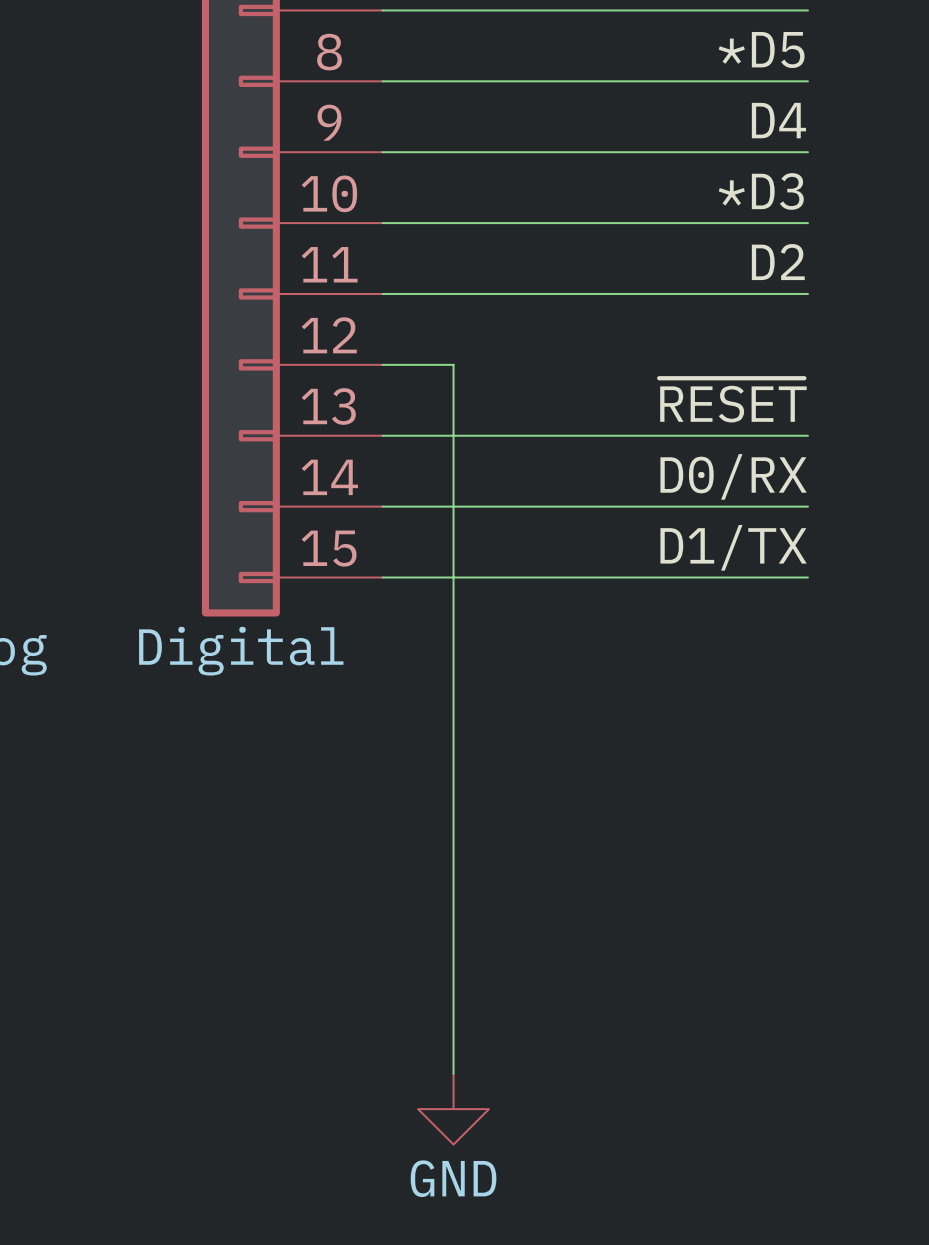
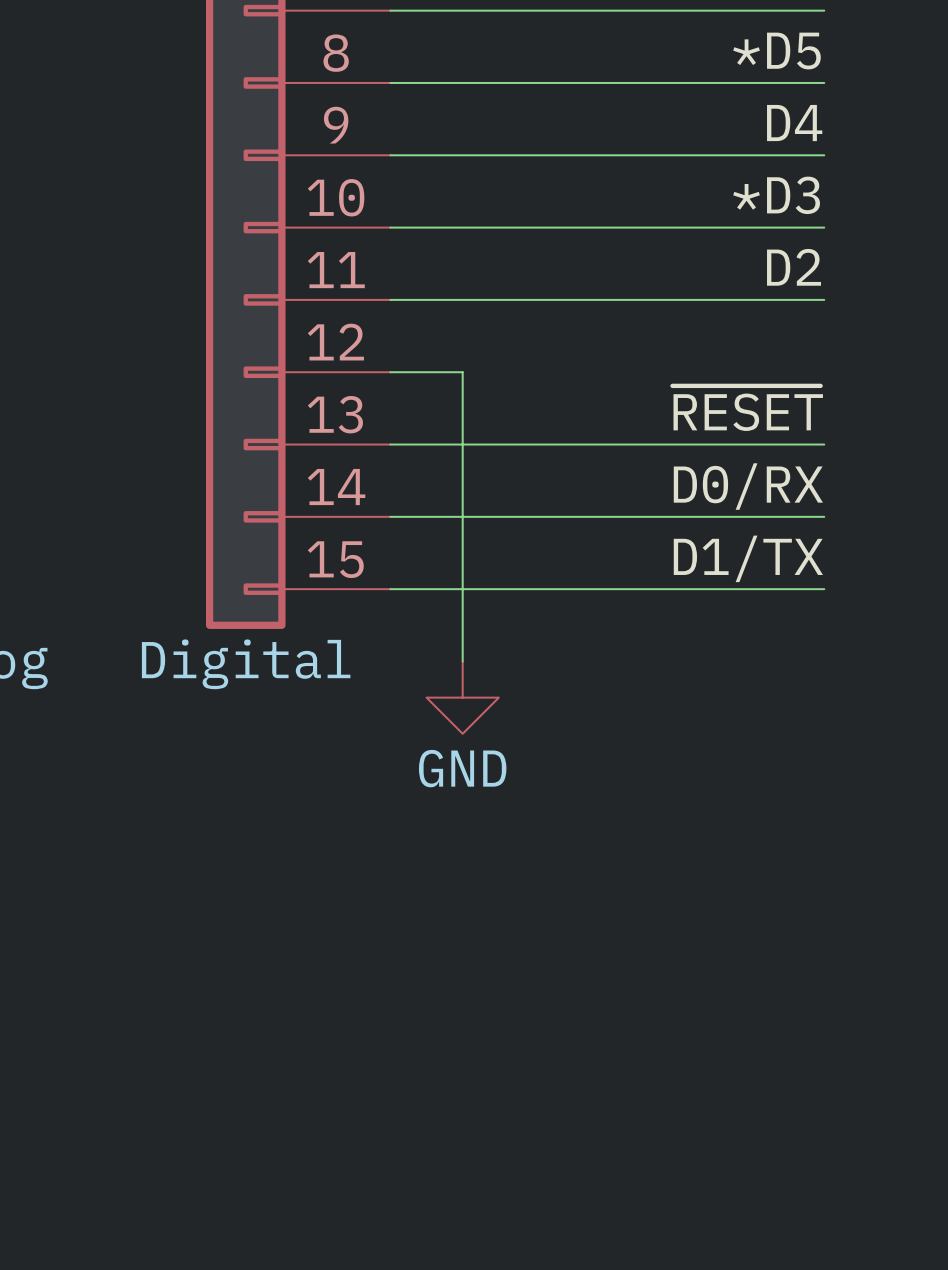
wire: (453, 648) (453, 1073) -> none
power symbol position: GND (453, 1109) -> GND (462, 697)

